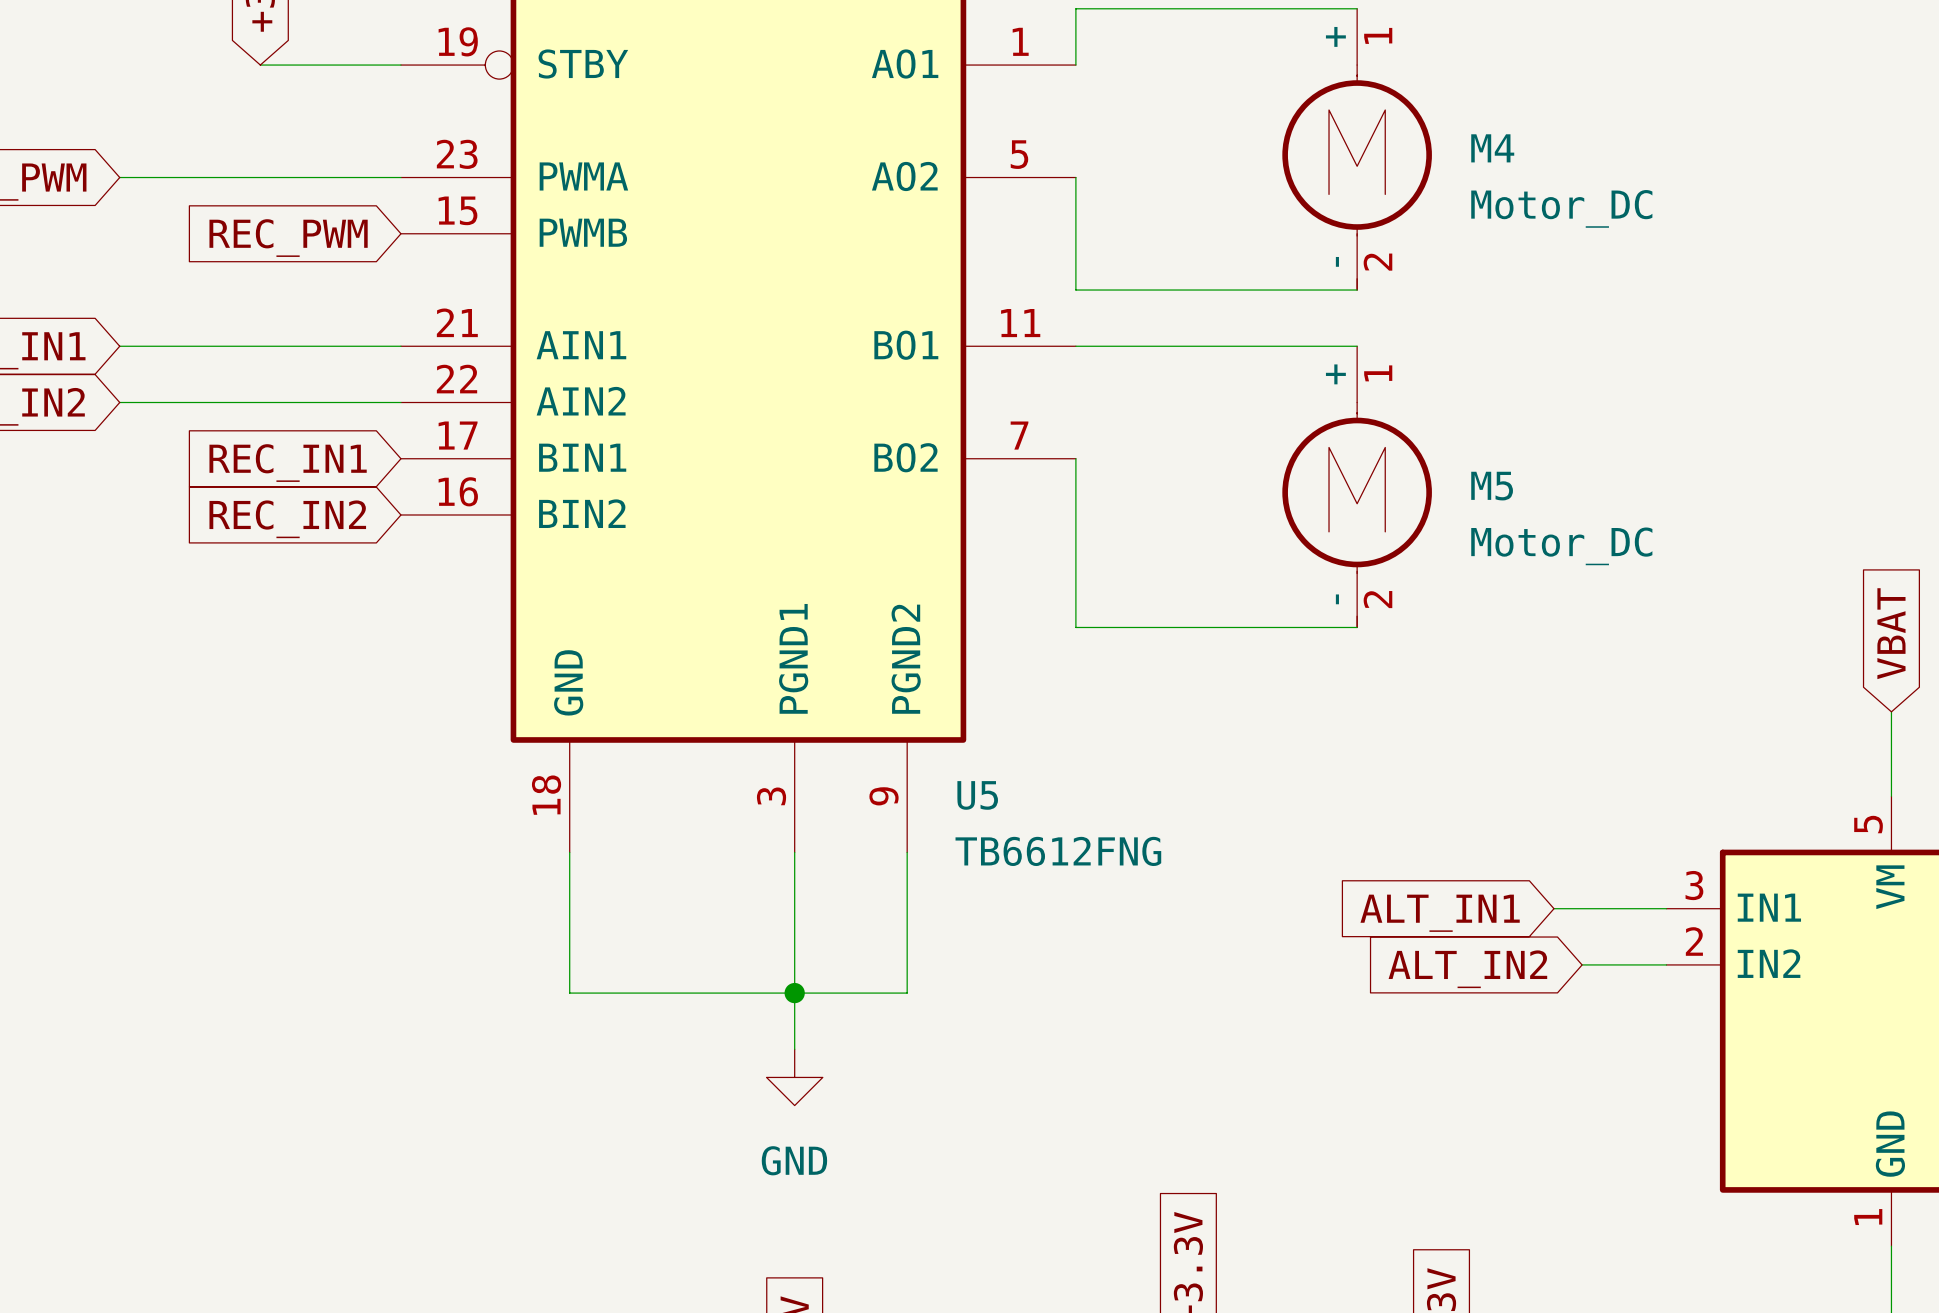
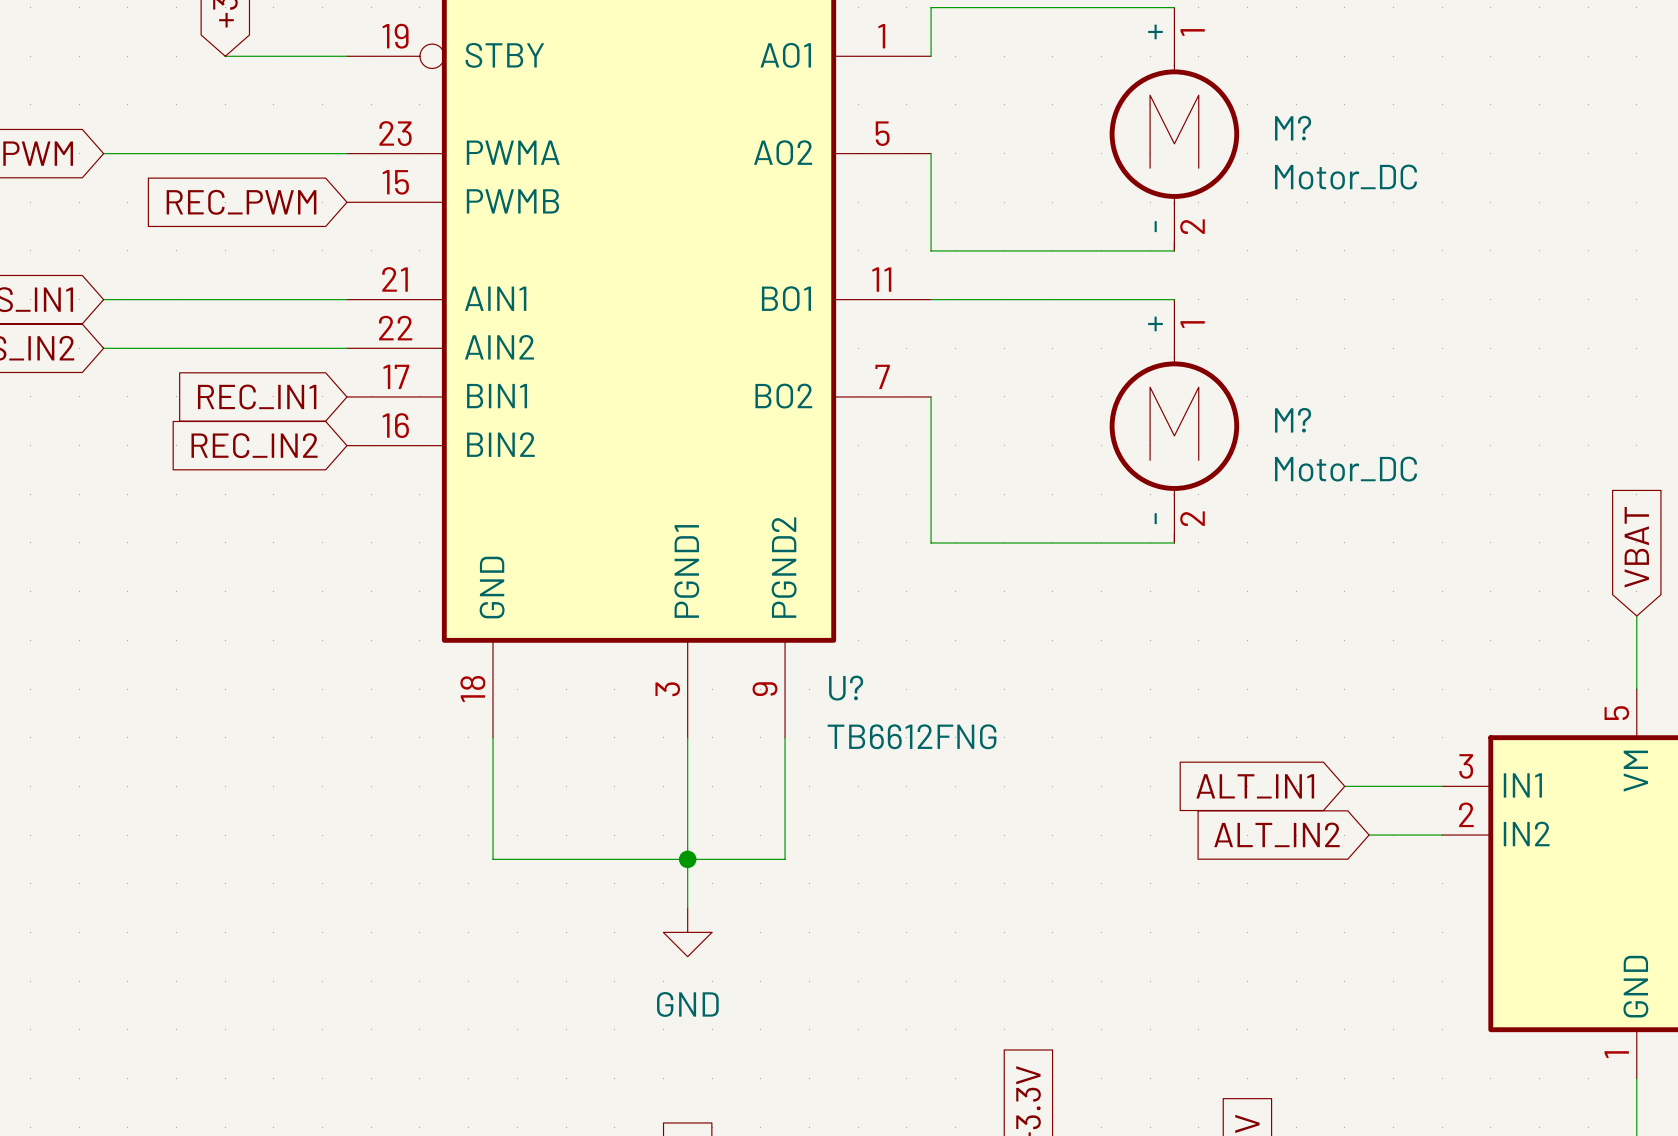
M4 name: M4 (1492, 148) -> M? (1293, 128)
M5 name: M5 (1492, 486) -> M? (1293, 420)
U5 name: U5 (977, 795) -> U? (846, 688)

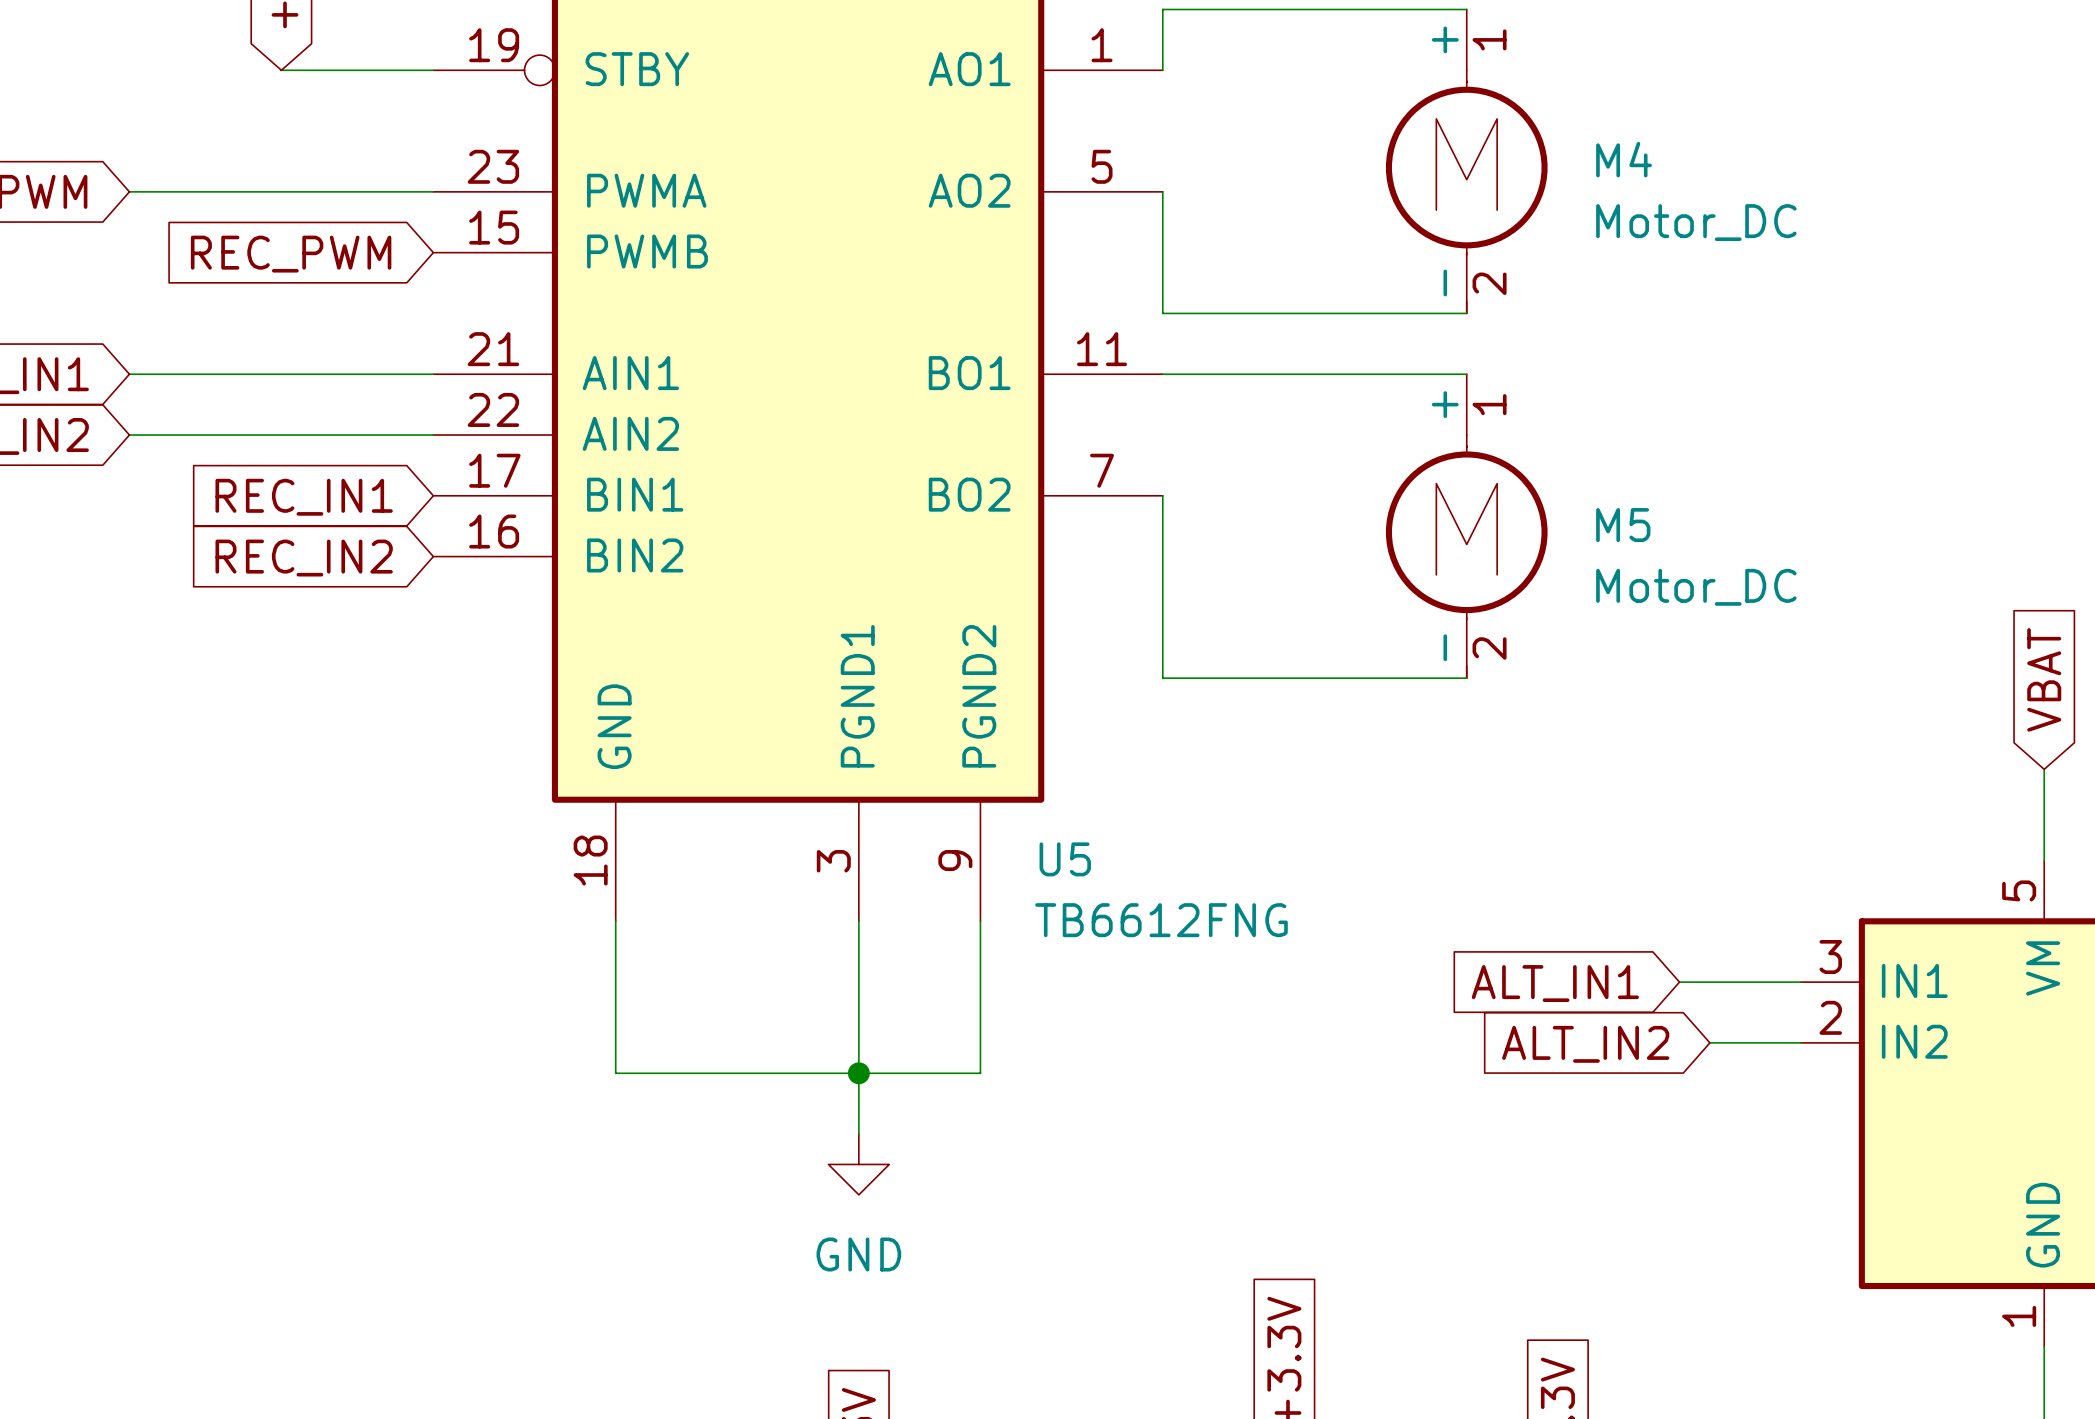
M? name: M? (1293, 128) -> M4 (1624, 159)
M? name: M? (1293, 420) -> M5 (1623, 525)
U? name: U? (846, 688) -> U5 (1065, 859)

